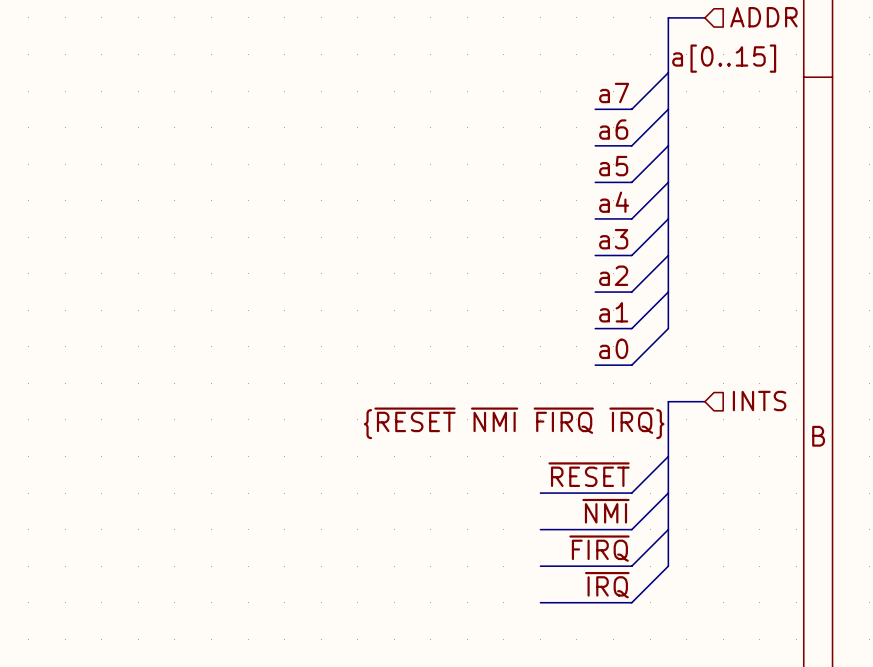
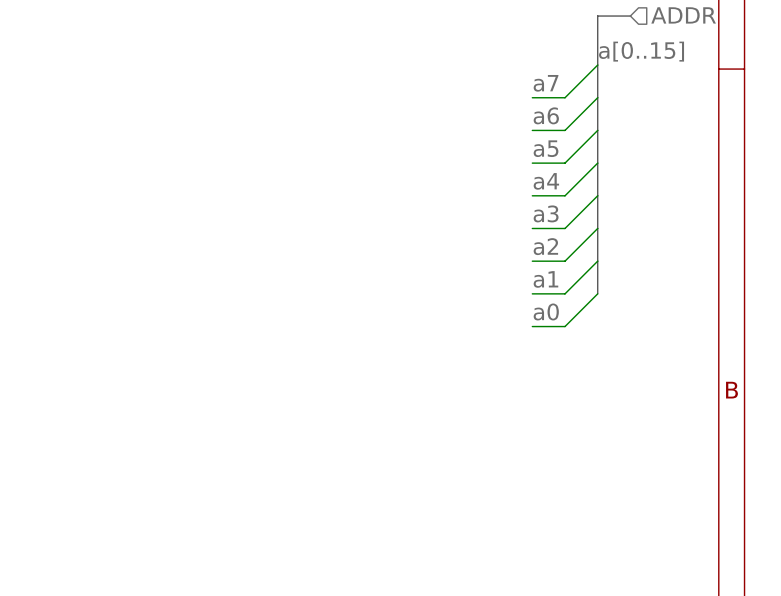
bus: (704, 401) (668, 401) (668, 566) -> none
hierarchical label: INTS (759, 401) -> none
label: {~{RESET} ~{NMI} ~{FIRQ} ~{IRQ}} (514, 423) -> none
wire: (668, 456) (631, 493) (540, 493) -> none
label: ~{RESET} (589, 474) -> none
wire: (668, 493) (631, 529) (540, 529) -> none
label: ~{NMI} (605, 511) -> none
wire: (668, 529) (631, 566) (540, 566) -> none
label: ~{FIRQ} (599, 548) -> none
wire: (668, 566) (631, 602) (540, 602) -> none
label: ~{IRQ} (607, 585) -> none

